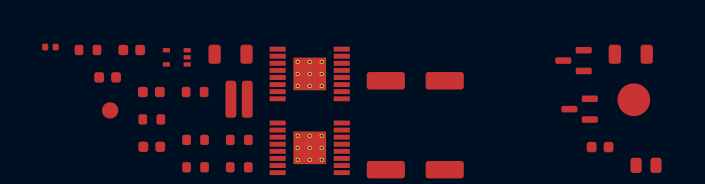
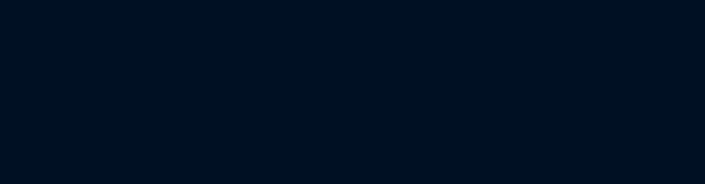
part: (50, 47) -> none
part: (87, 49) -> none
part: (131, 49) -> none
part: (230, 54) -> none
part: (630, 54) -> none
part: (176, 57) -> none
part: (573, 60) -> none
part: (309, 73) -> none
part: (107, 77) -> none
part: (415, 80) -> none
part: (151, 92) -> none
part: (195, 92) -> none
part: (239, 99) -> none
part: (633, 99) -> none
part: (579, 109) -> none
part: (110, 110) -> none
part: (151, 119) -> none
part: (195, 139) -> none
part: (239, 139) -> none
part: (151, 146) -> none
part: (309, 147) -> none
part: (600, 147) -> none
part: (646, 165) -> none
part: (195, 167) -> none
part: (239, 167) -> none
part: (415, 169) -> none

